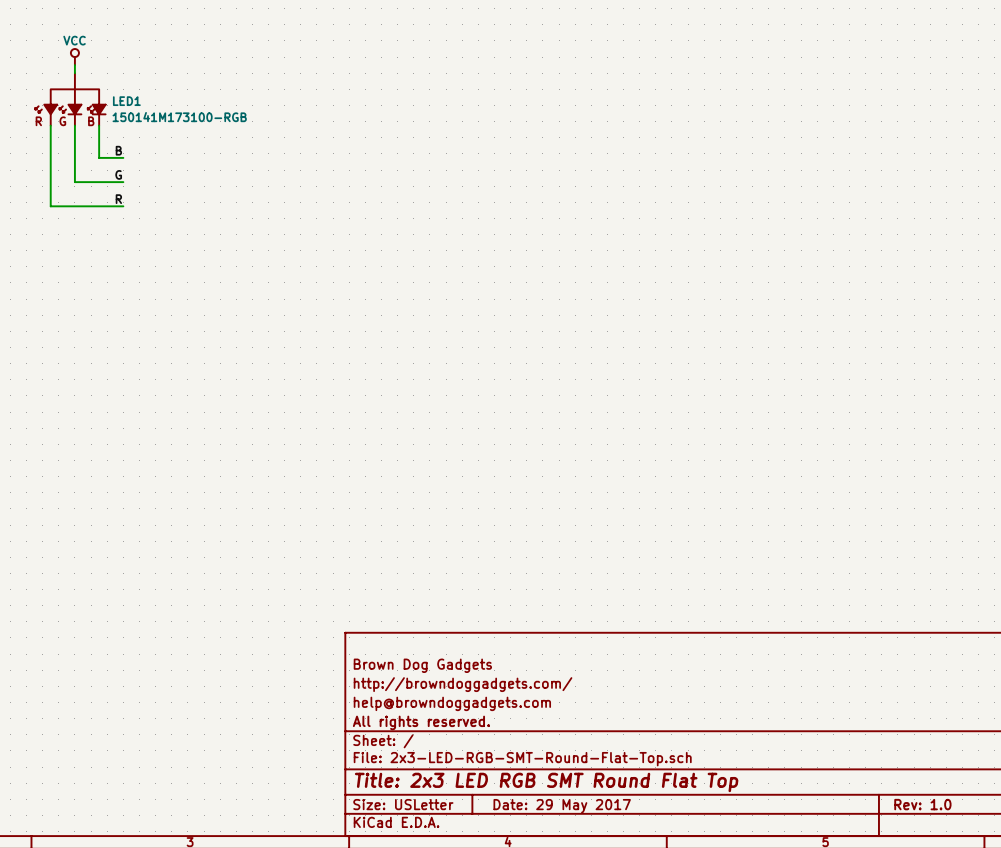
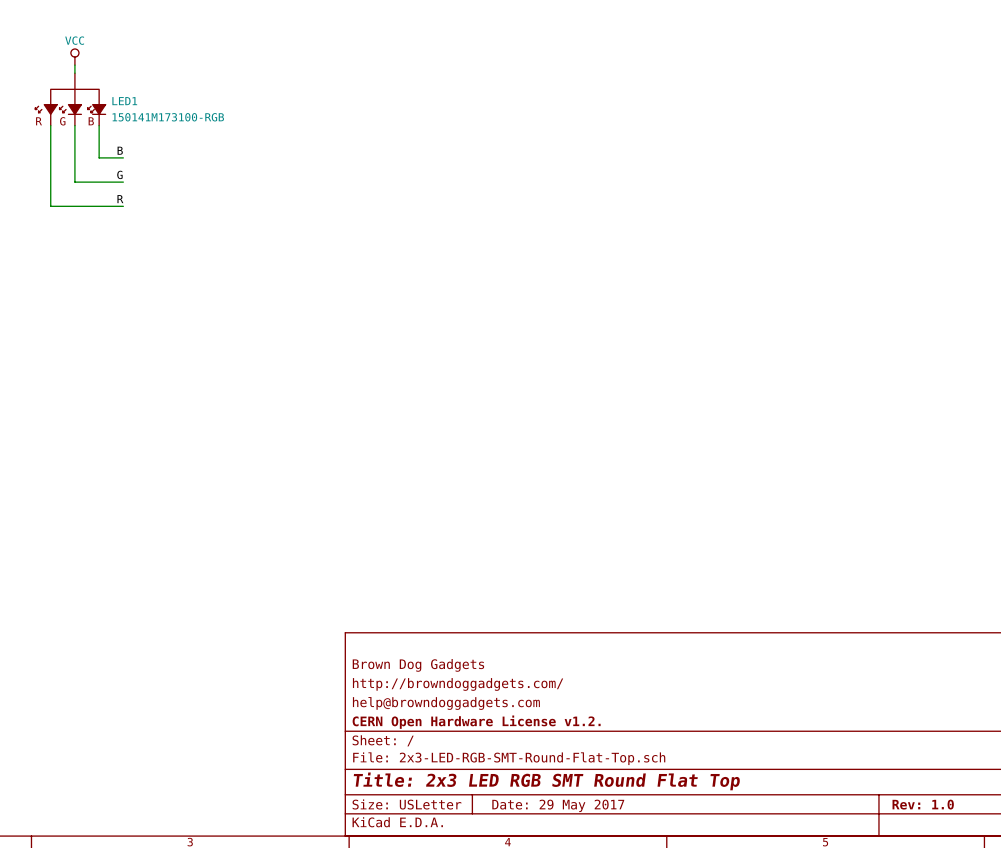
title block: All rights reserved. (421, 722) -> CERN Open Hardware License v1.2. (476, 722)

